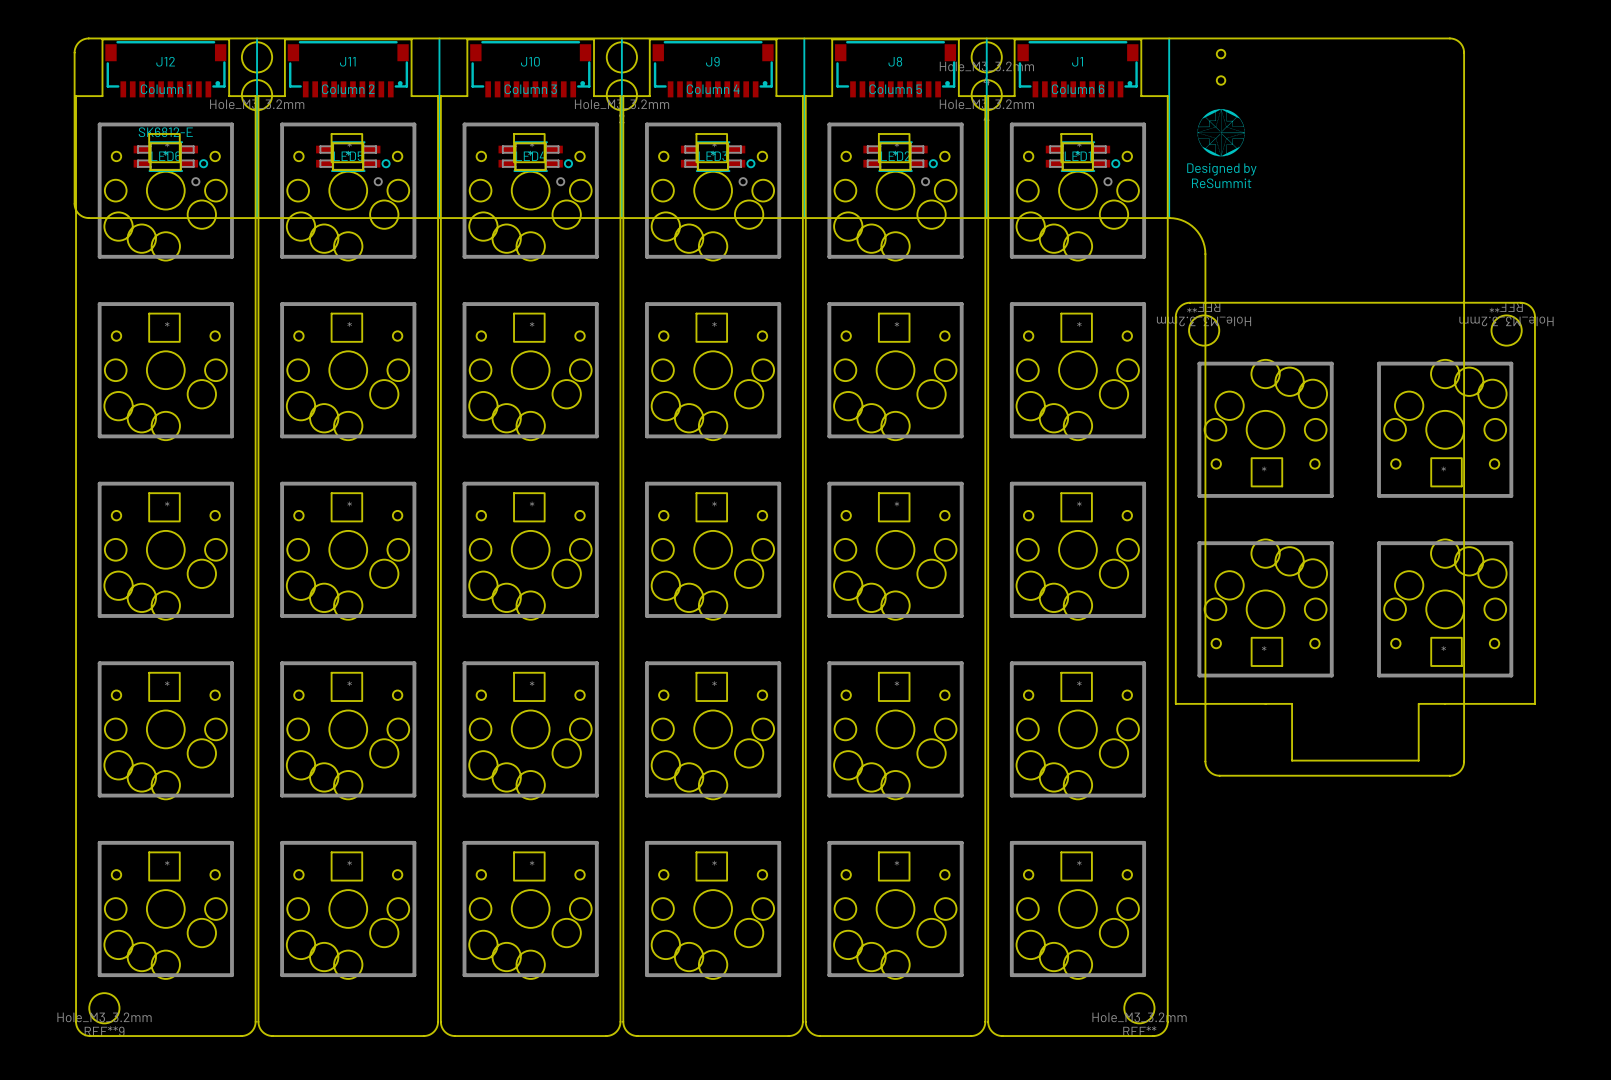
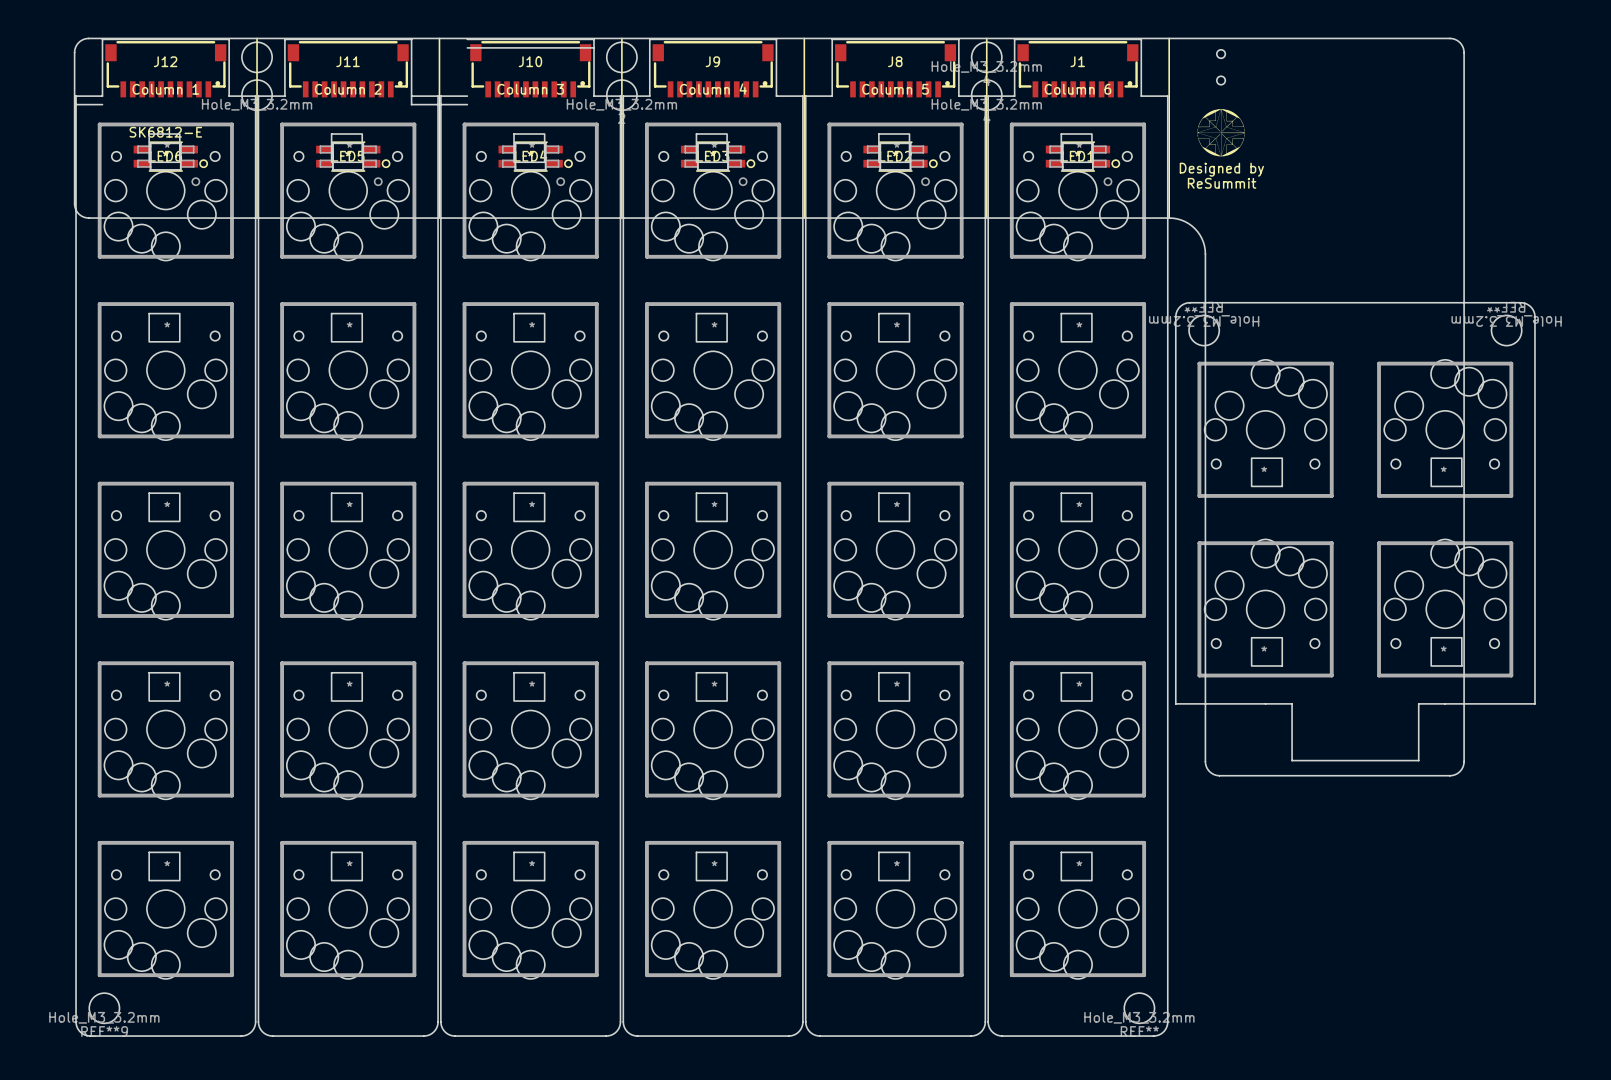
board edge: (467, 39) (467, 96) -> none
board edge: none -> (467, 47) (594, 47)
board edge: none -> (411, 96) (411, 104) (438, 104)
board edge: none -> (76, 104) (102, 104)
board edge: none -> (440, 104) (467, 104)

